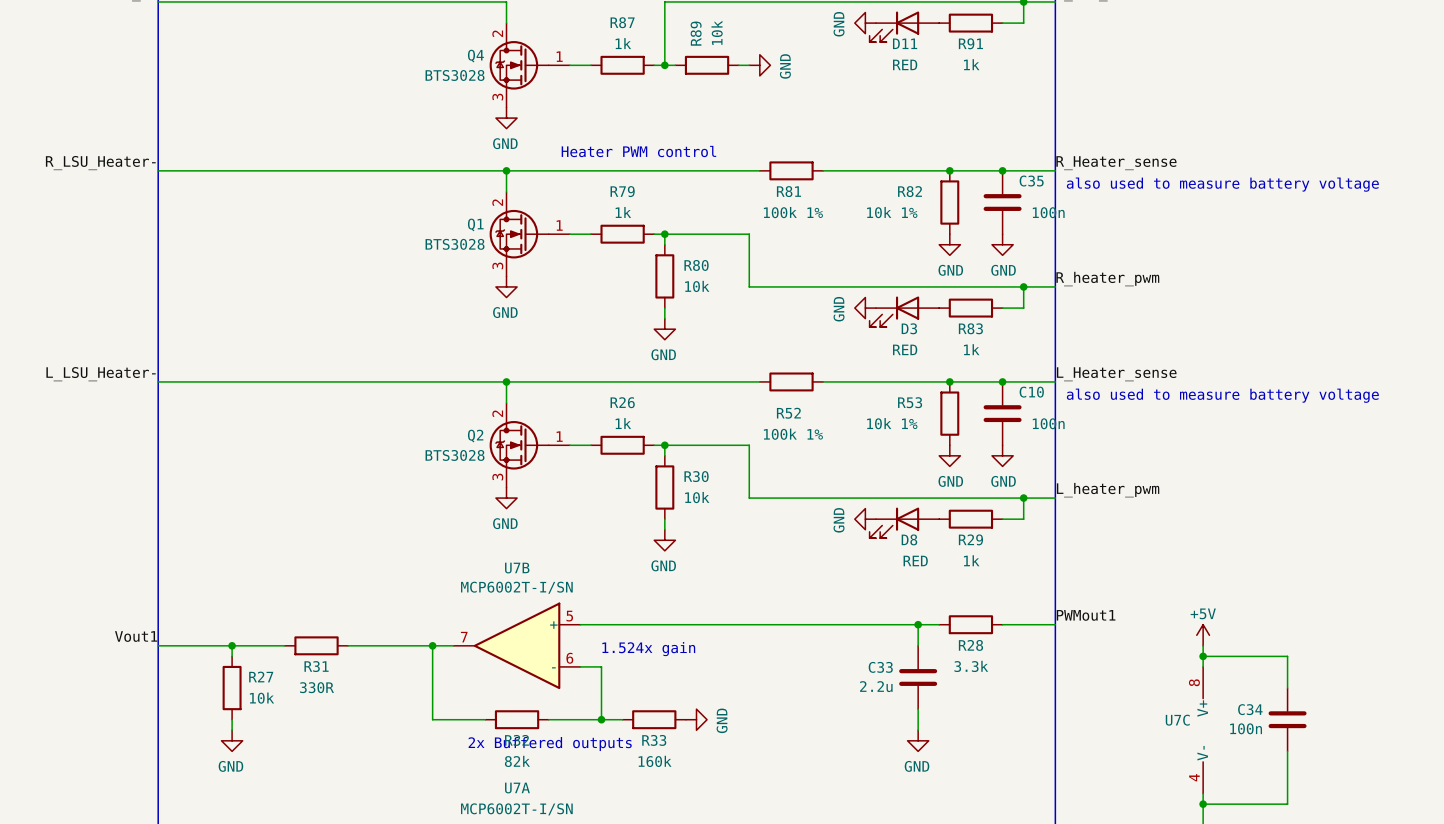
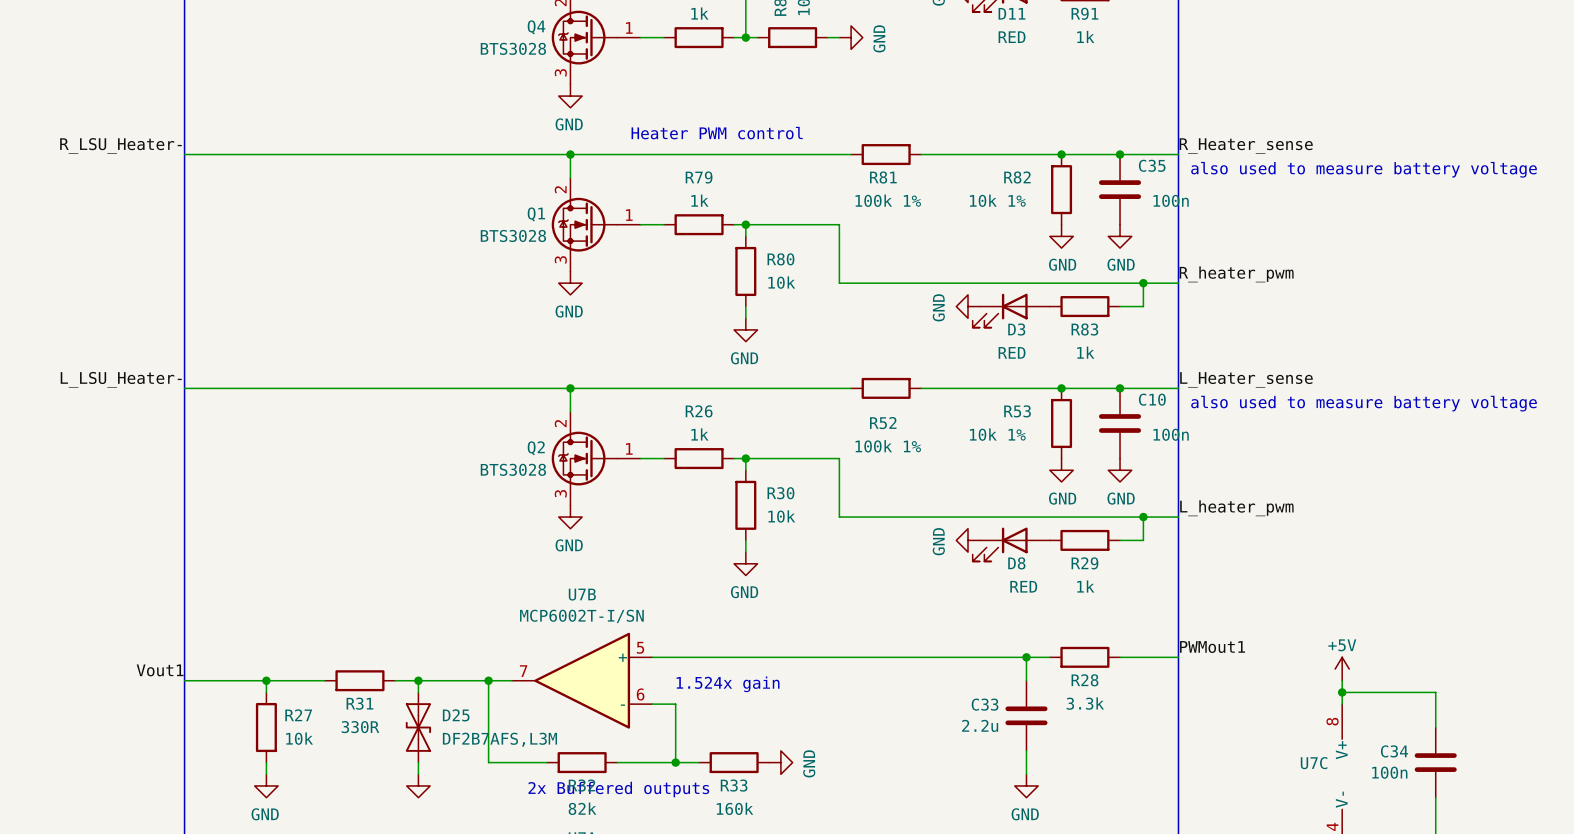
wire: none -> (418, 680) (418, 692)
junction: none -> (418, 680)
D25: none -> DF2B7AFS,L3M (418, 727)
wire: none -> (418, 762) (418, 774)
power symbol: none -> (418, 785)

